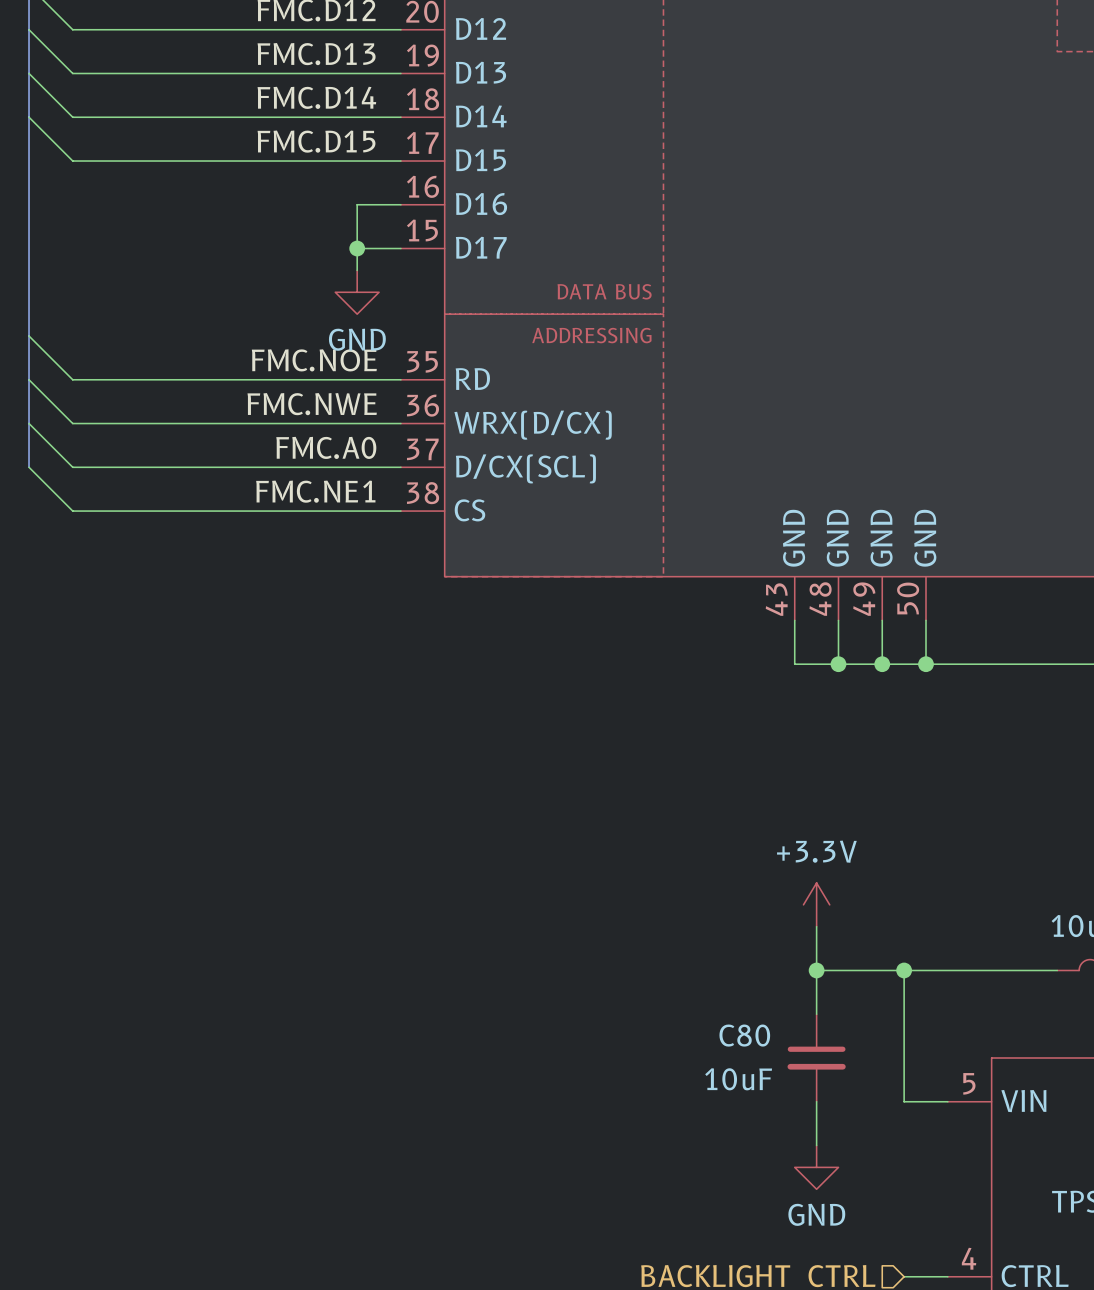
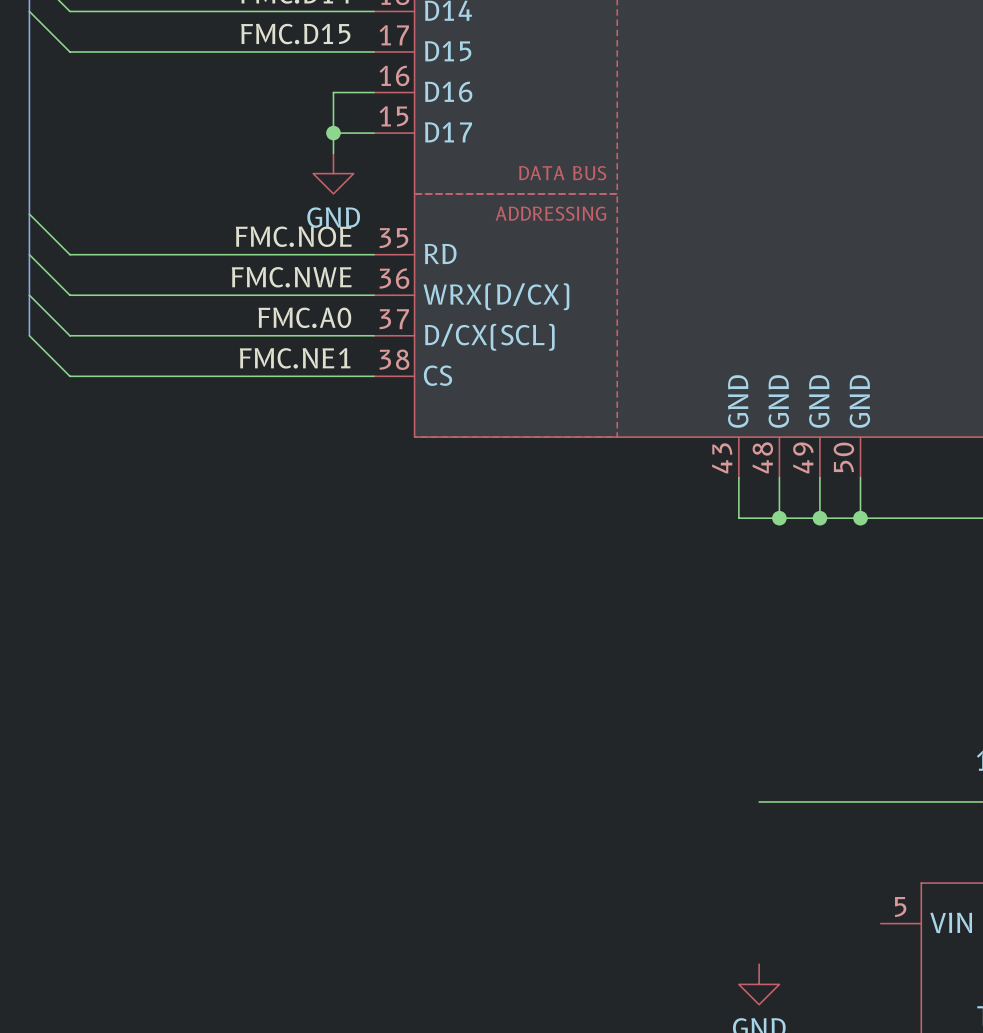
power symbol: +3.3V (816, 904) -> none
wire: (816, 926) (816, 1014) -> none
junction: (816, 970) -> none
wire: (904, 970) (904, 1101) (947, 1101) -> none
junction: (904, 970) -> none
C80: 10uF (816, 1058) -> none
wire: (816, 1101) (816, 1145) -> none

